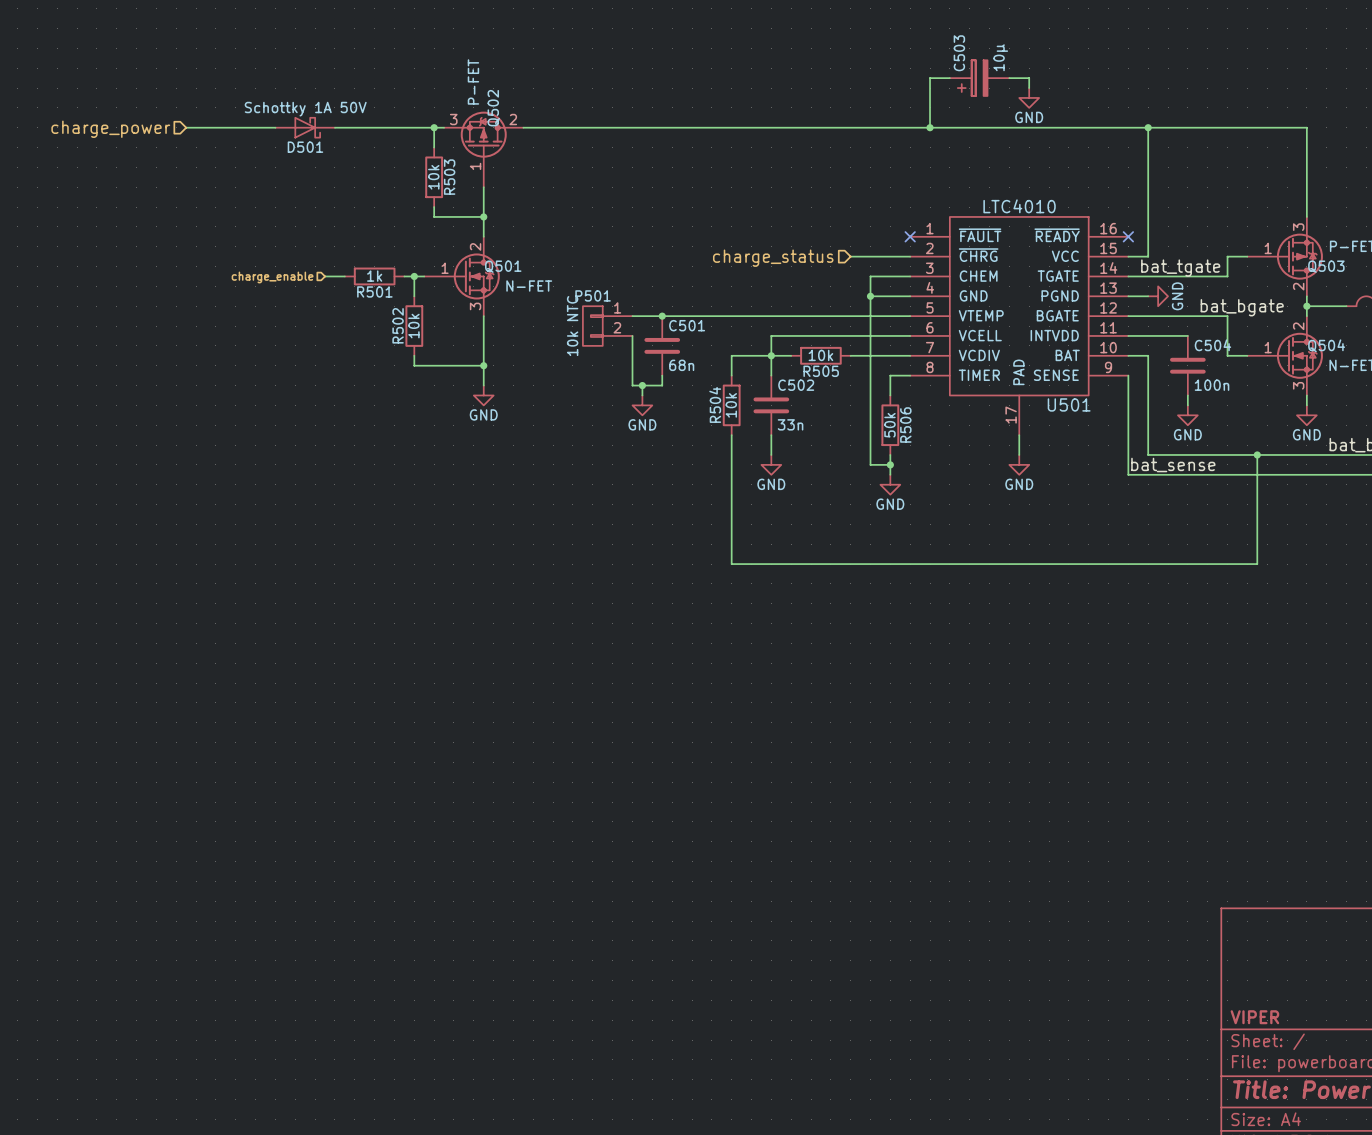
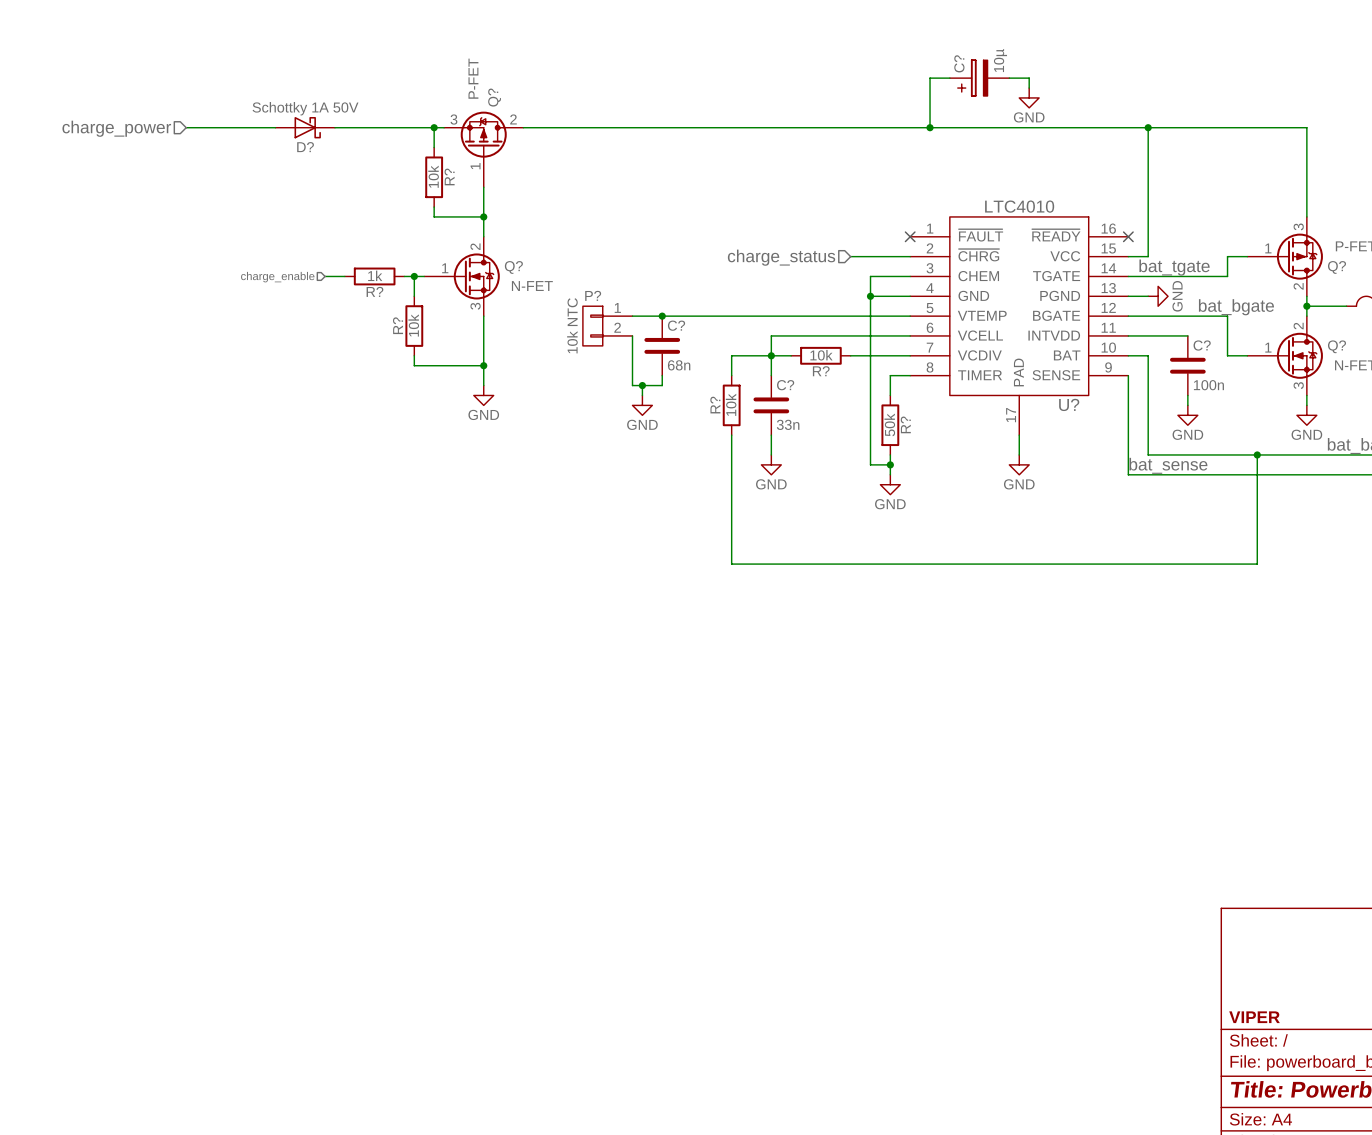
C503 name: C503 (959, 53) -> C? (959, 63)
Q502 name: Q502 (493, 108) -> Q? (494, 97)
D501 name: D501 (305, 147) -> D? (305, 147)
R503 name: R503 (449, 177) -> R? (449, 176)
Q501 name: Q501 (503, 266) -> Q? (513, 267)
Q503 name: Q503 (1326, 266) -> Q? (1337, 267)
R501 name: R501 (374, 291) -> R? (374, 291)
P501 name: P501 (593, 295) -> P? (593, 295)
R502 name: R502 (398, 325) -> R? (398, 325)
C501 name: C501 (687, 325) -> C? (676, 325)
C504 name: C504 (1212, 345) -> C? (1202, 345)
Q504 name: Q504 (1326, 345) -> Q? (1337, 346)
R505 name: R505 (821, 371) -> R? (821, 371)
C502 name: C502 (796, 385) -> C? (785, 385)
R504 name: R504 (715, 404) -> R? (715, 405)
U501 name: U501 (1069, 404) -> U? (1069, 404)
R506 name: R506 (905, 424) -> R? (905, 424)

